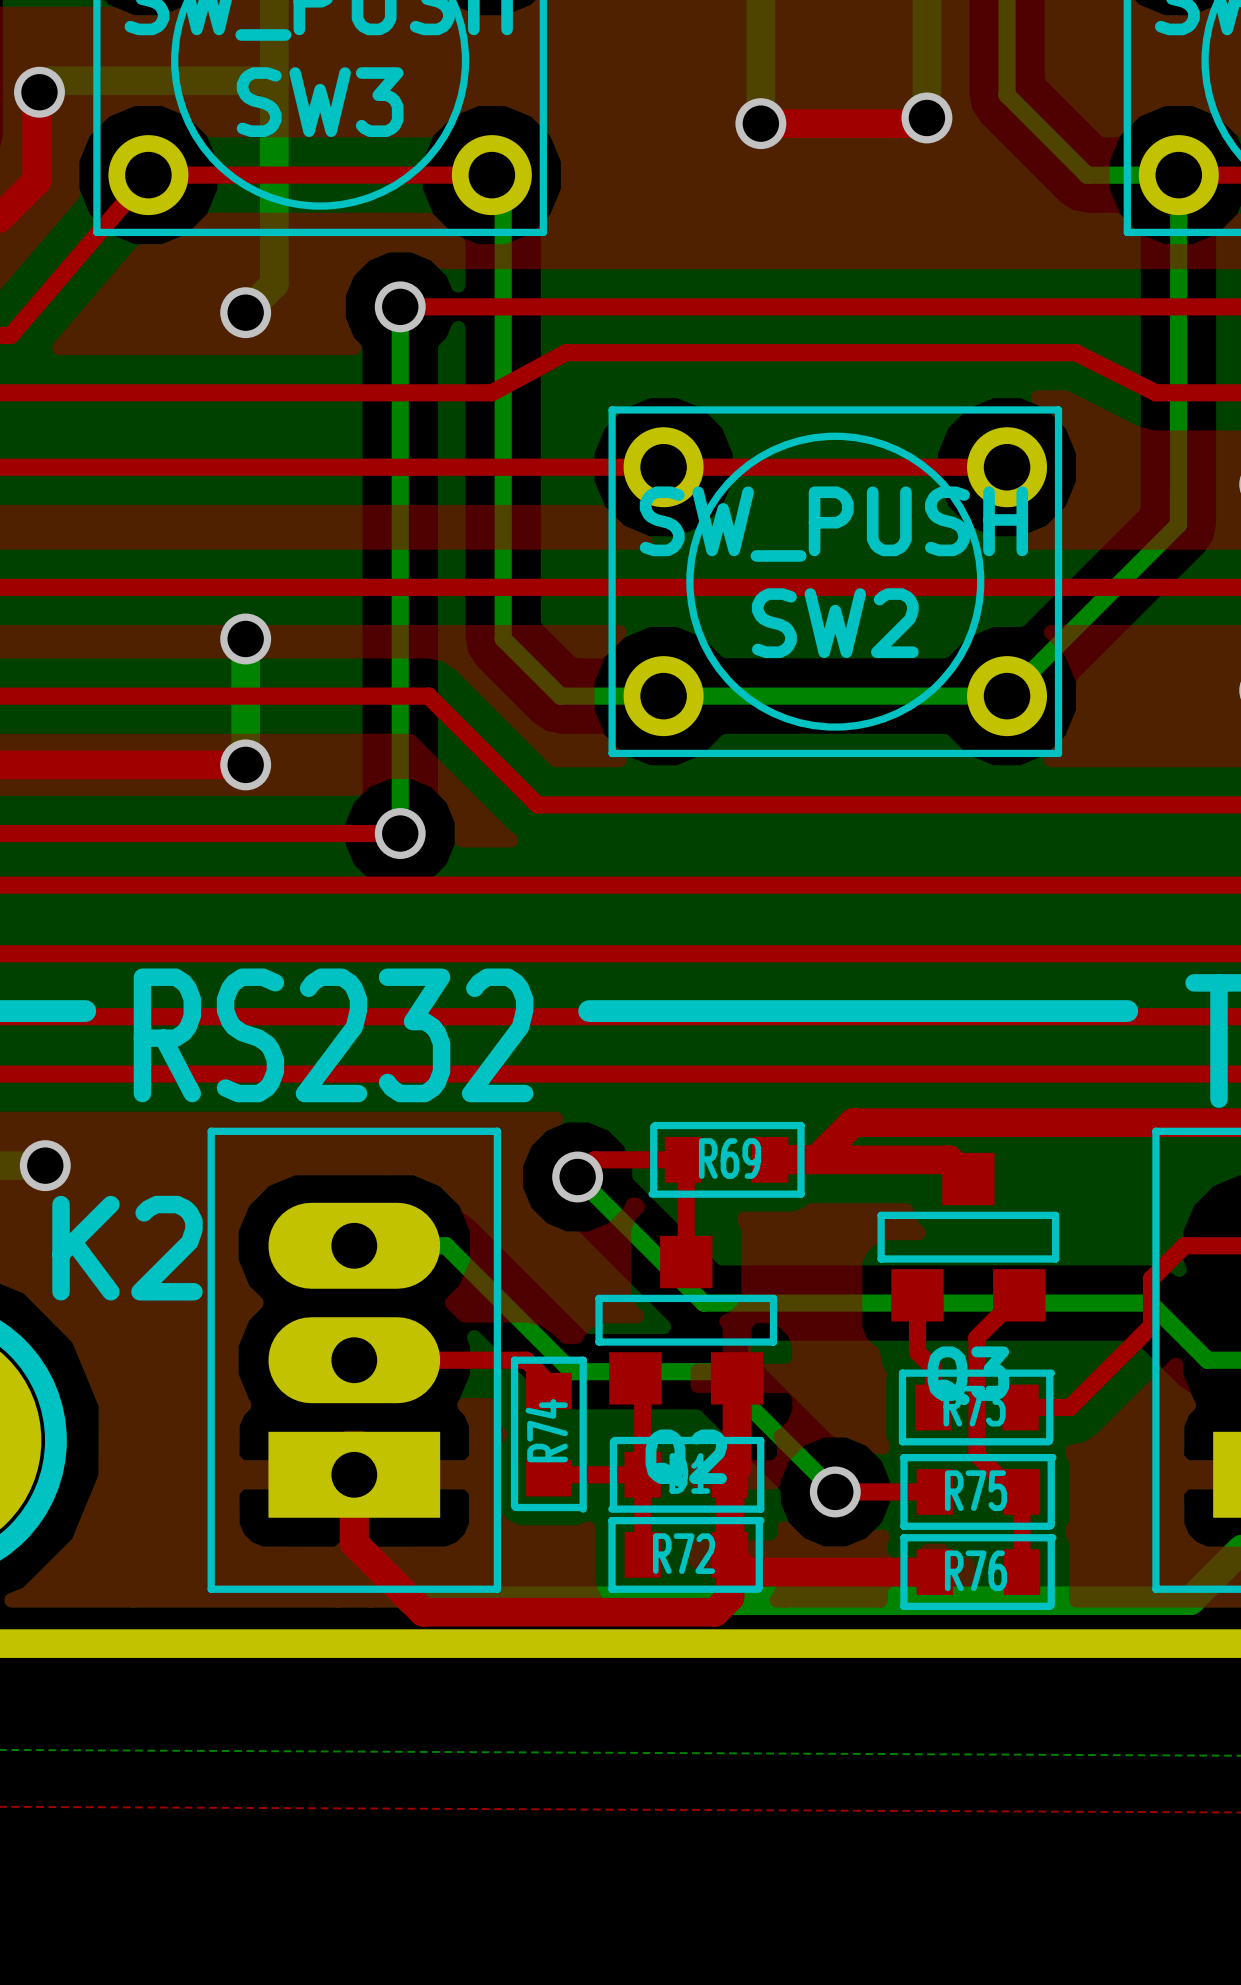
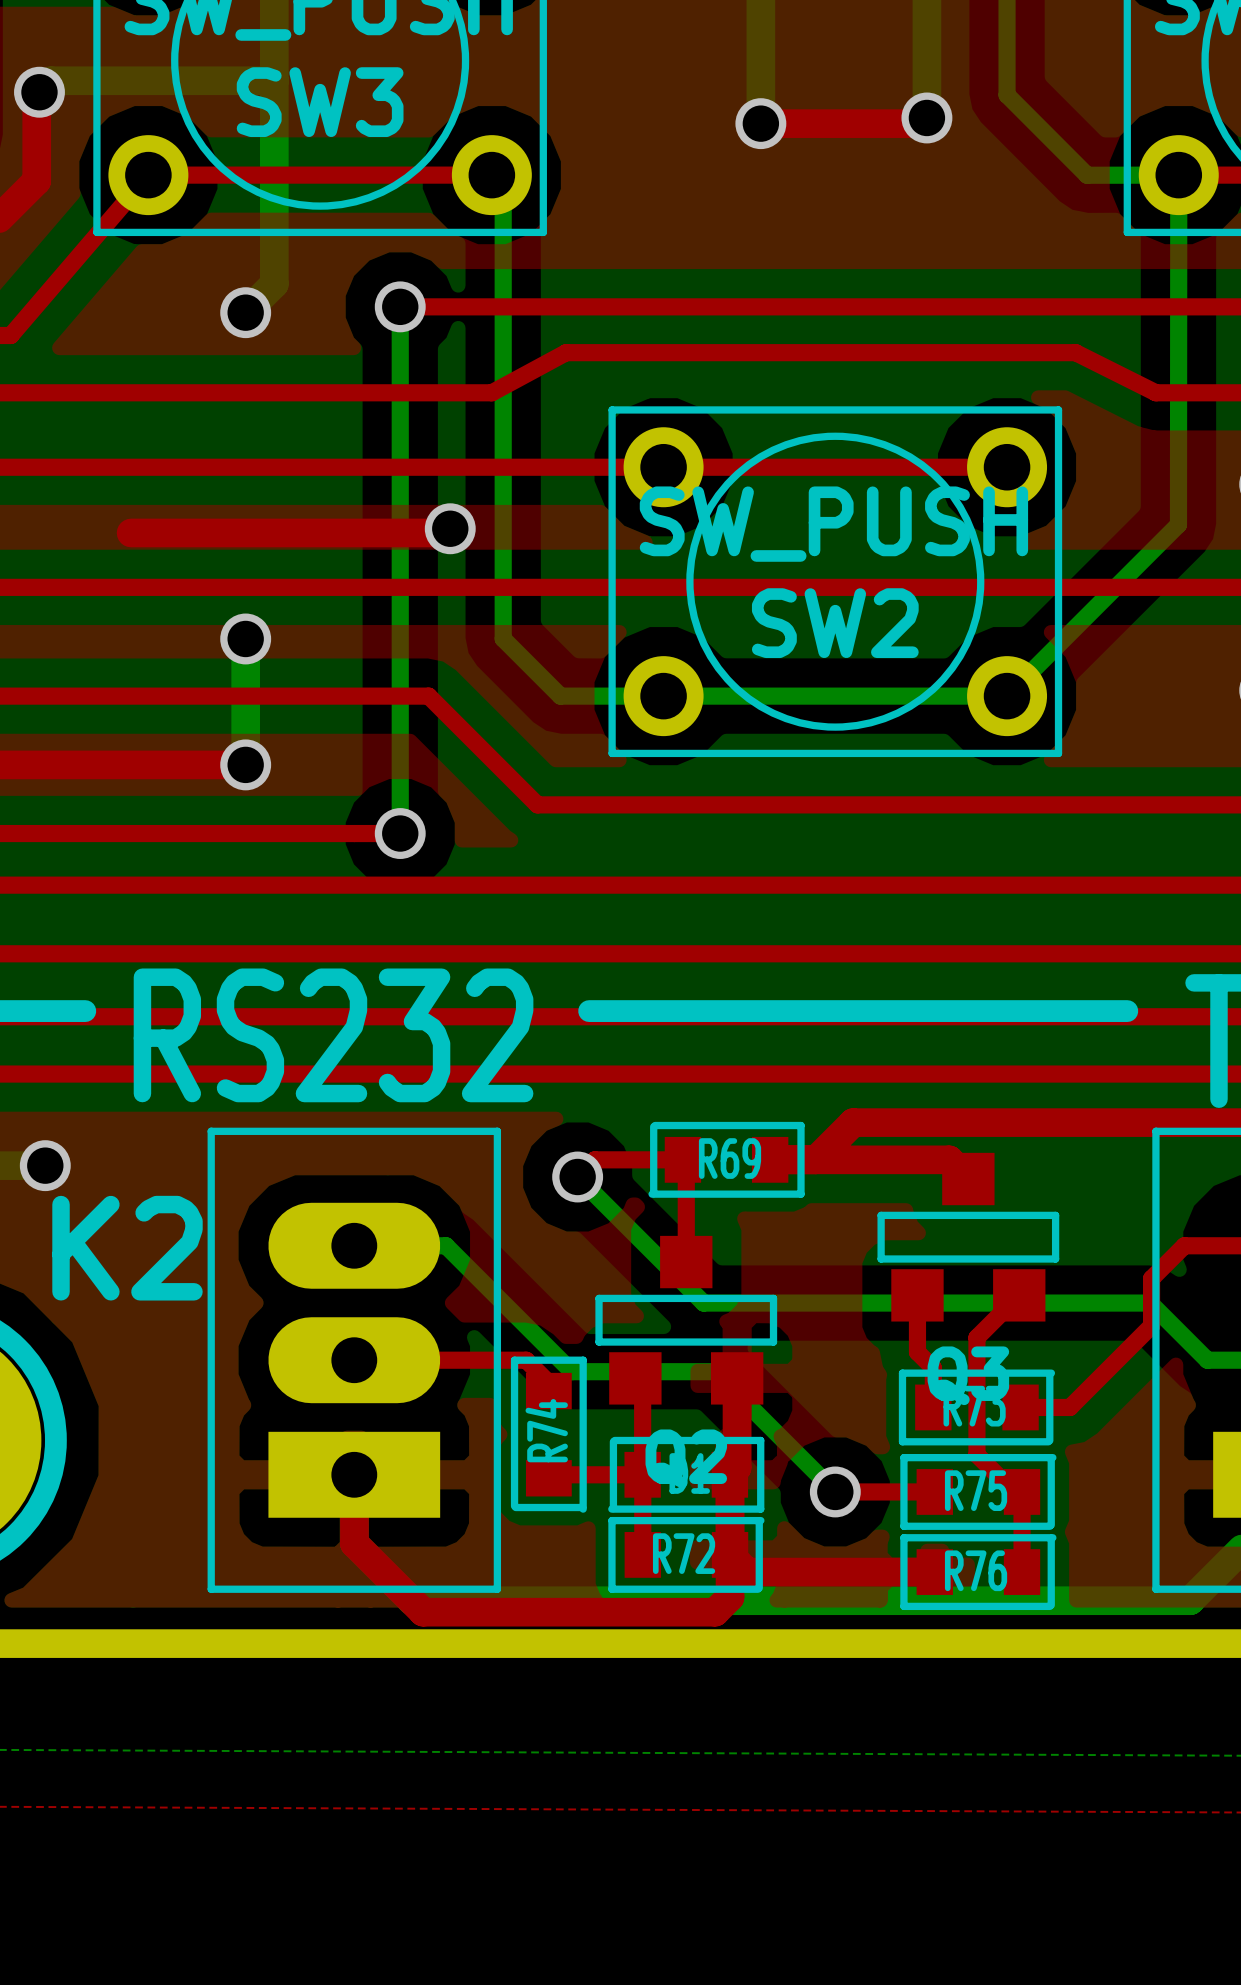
top track: none -> (450, 528) (446, 532) (131, 532)
via: none -> (450, 528)

